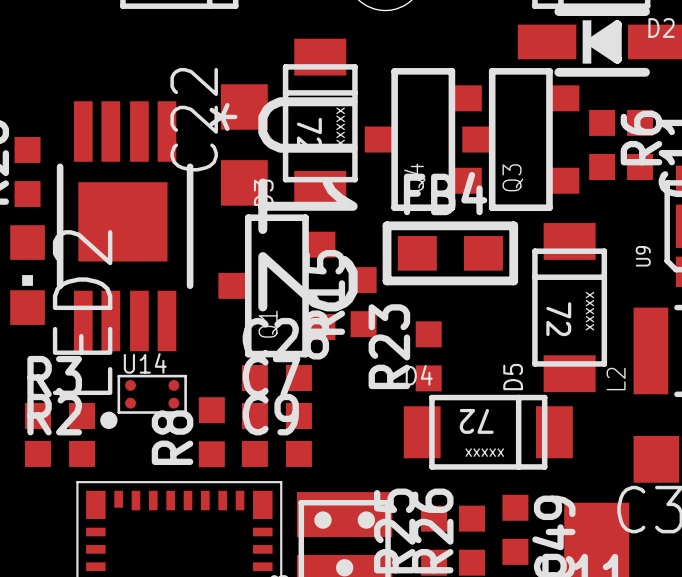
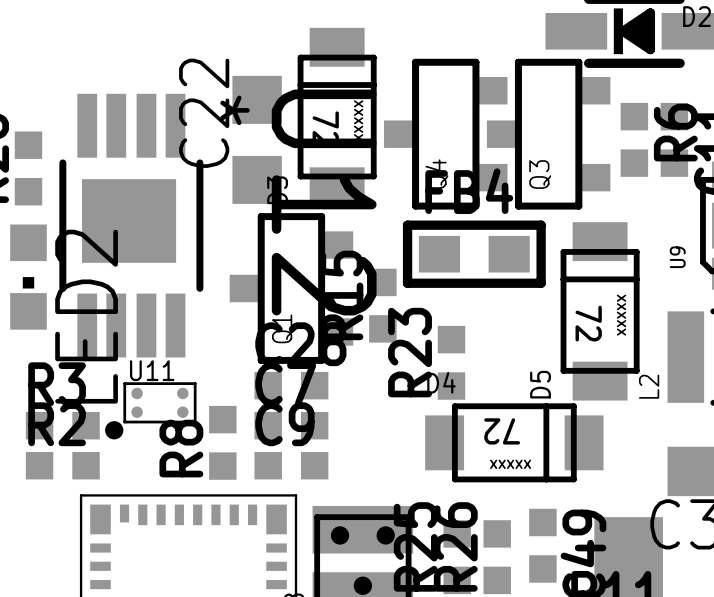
U14 name: U14 (145, 363) -> U11 (152, 370)

